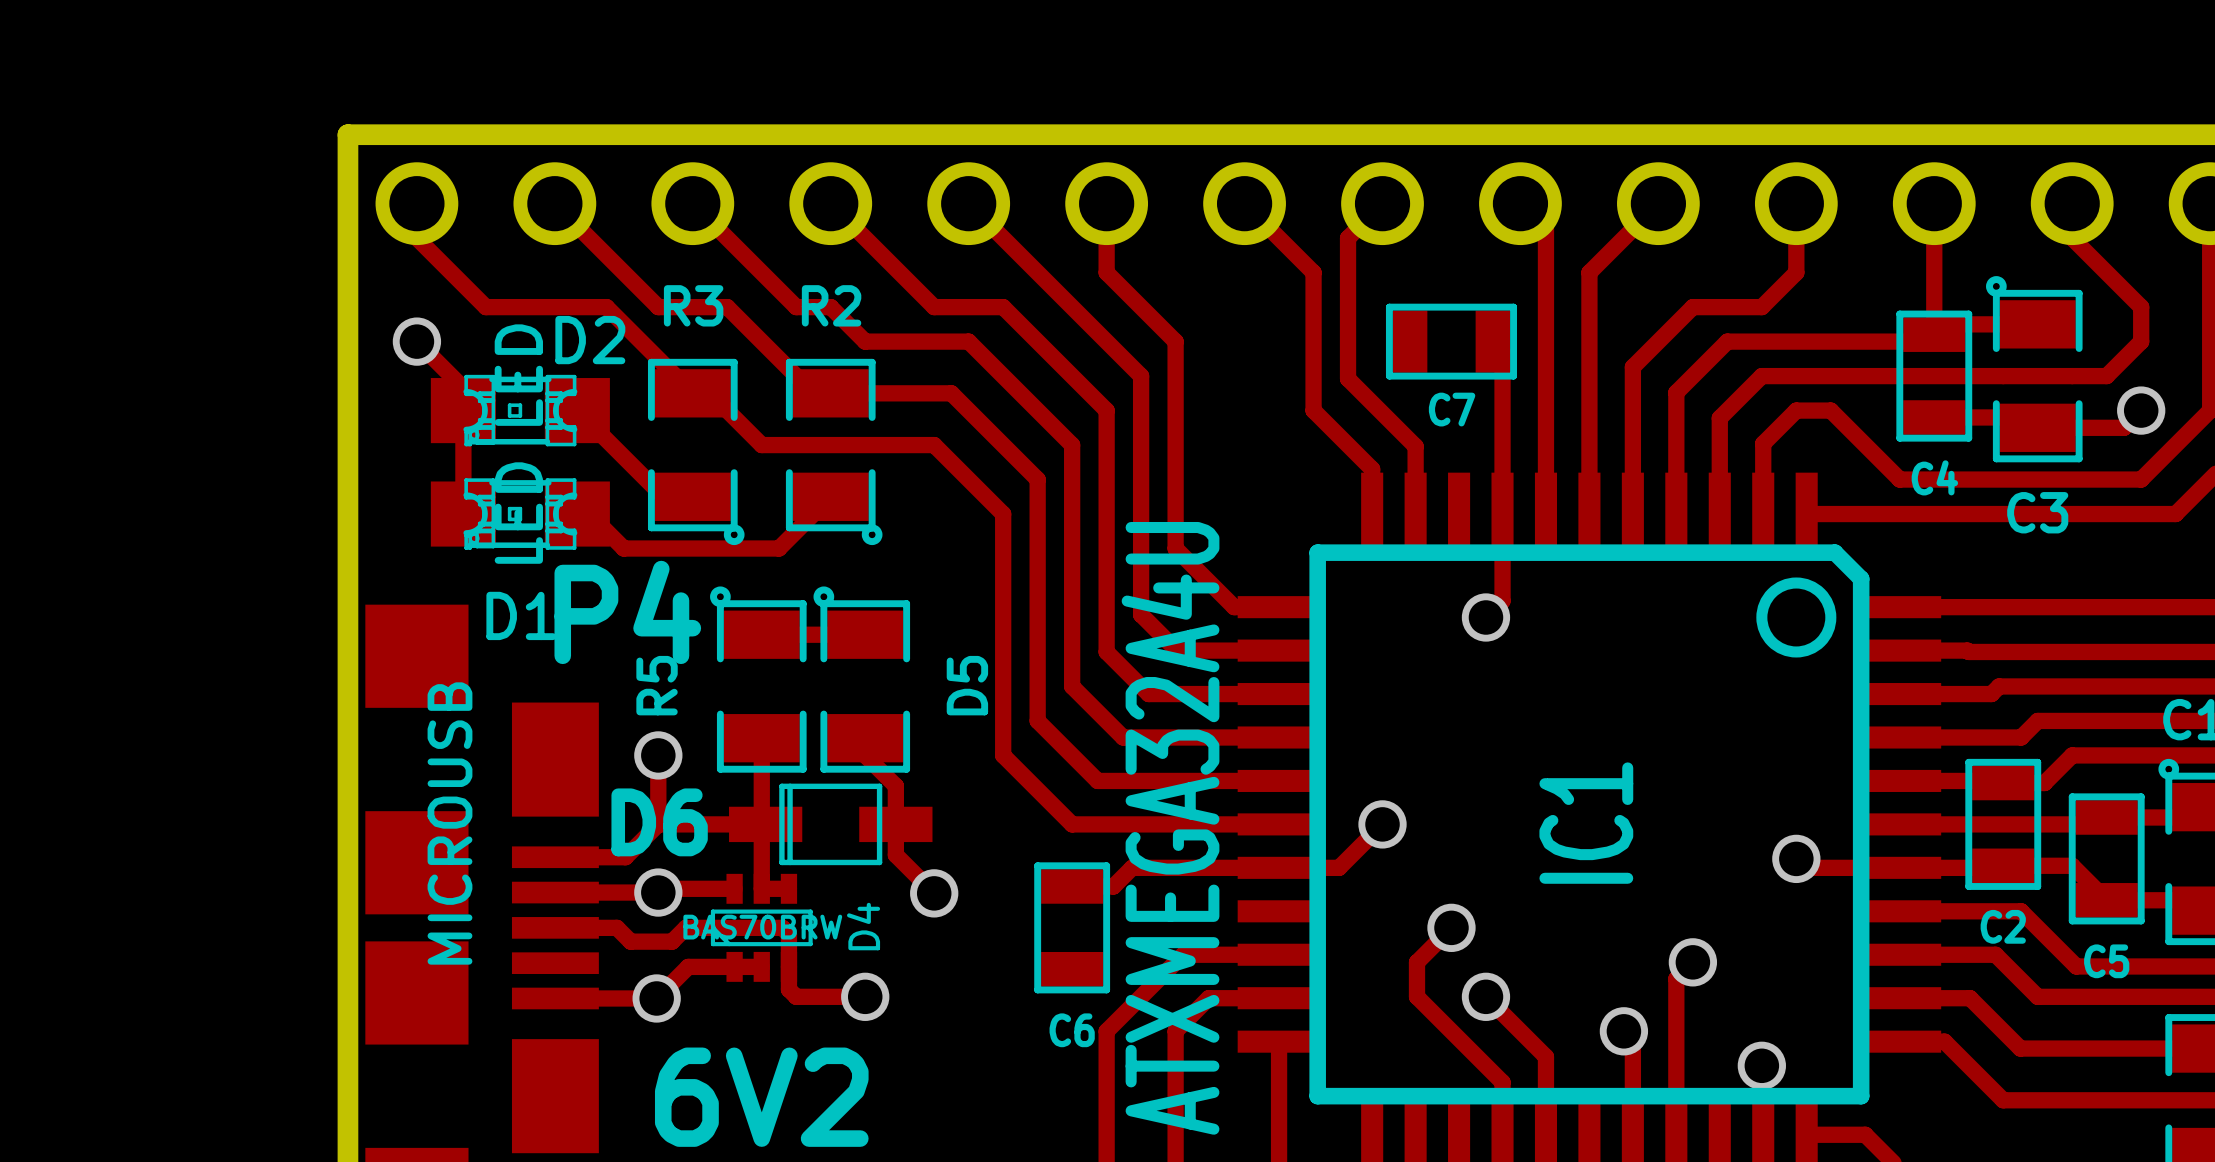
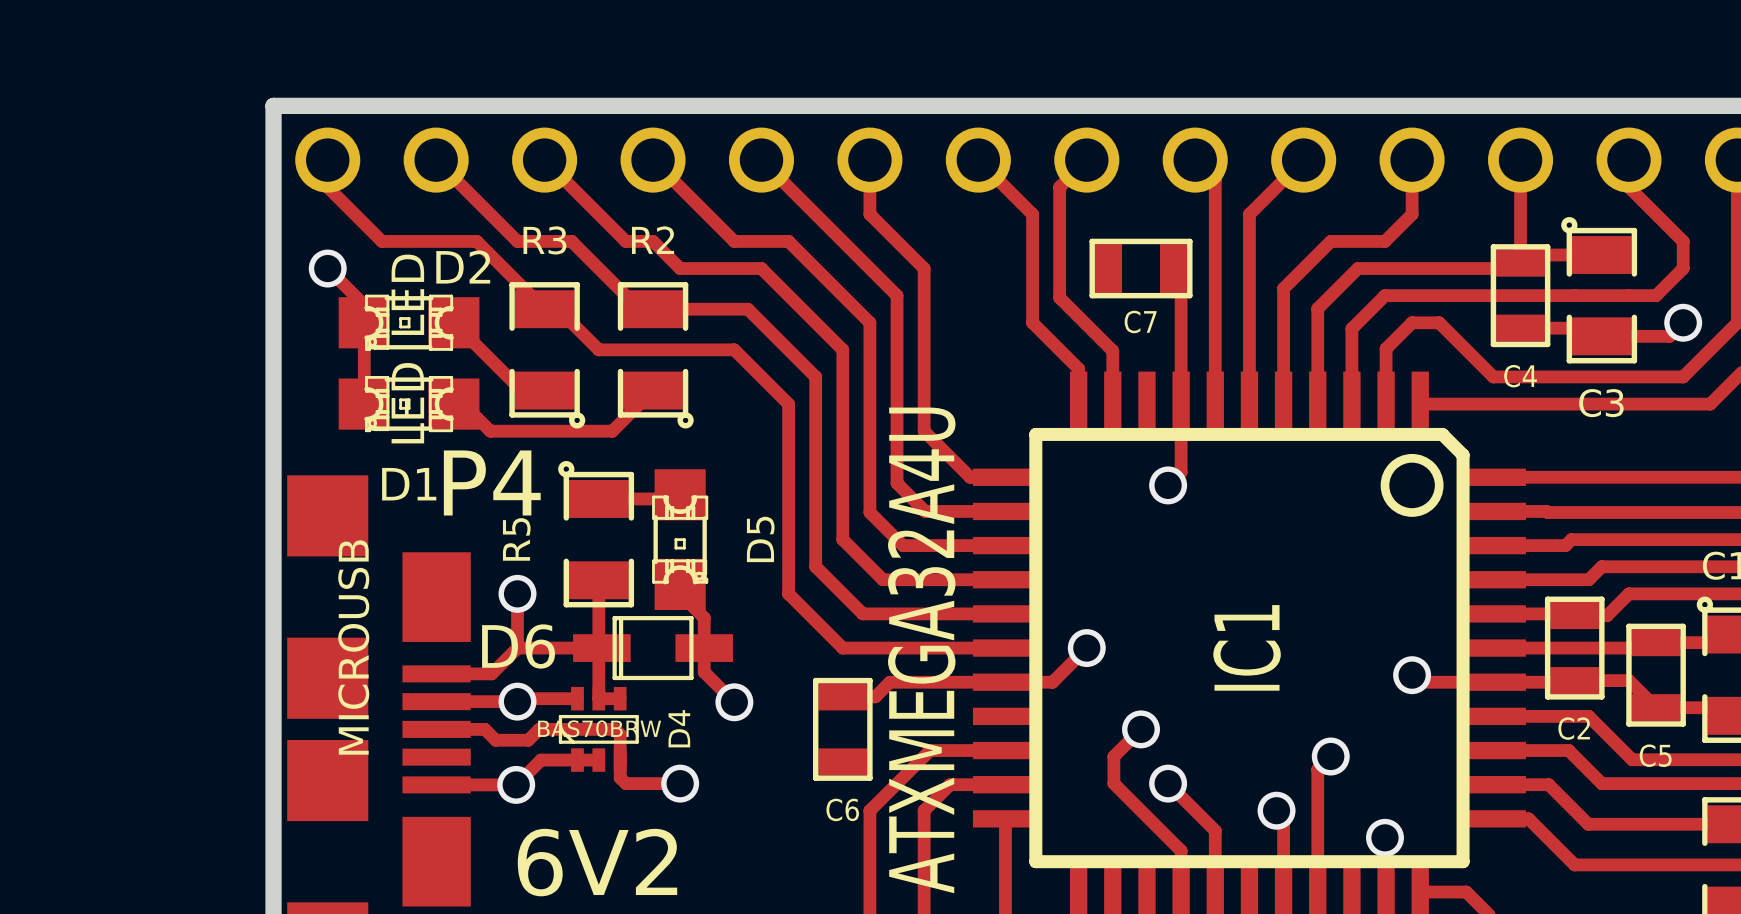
D5 footprint: [813, 586, 911, 773] -> [652, 469, 709, 611]

